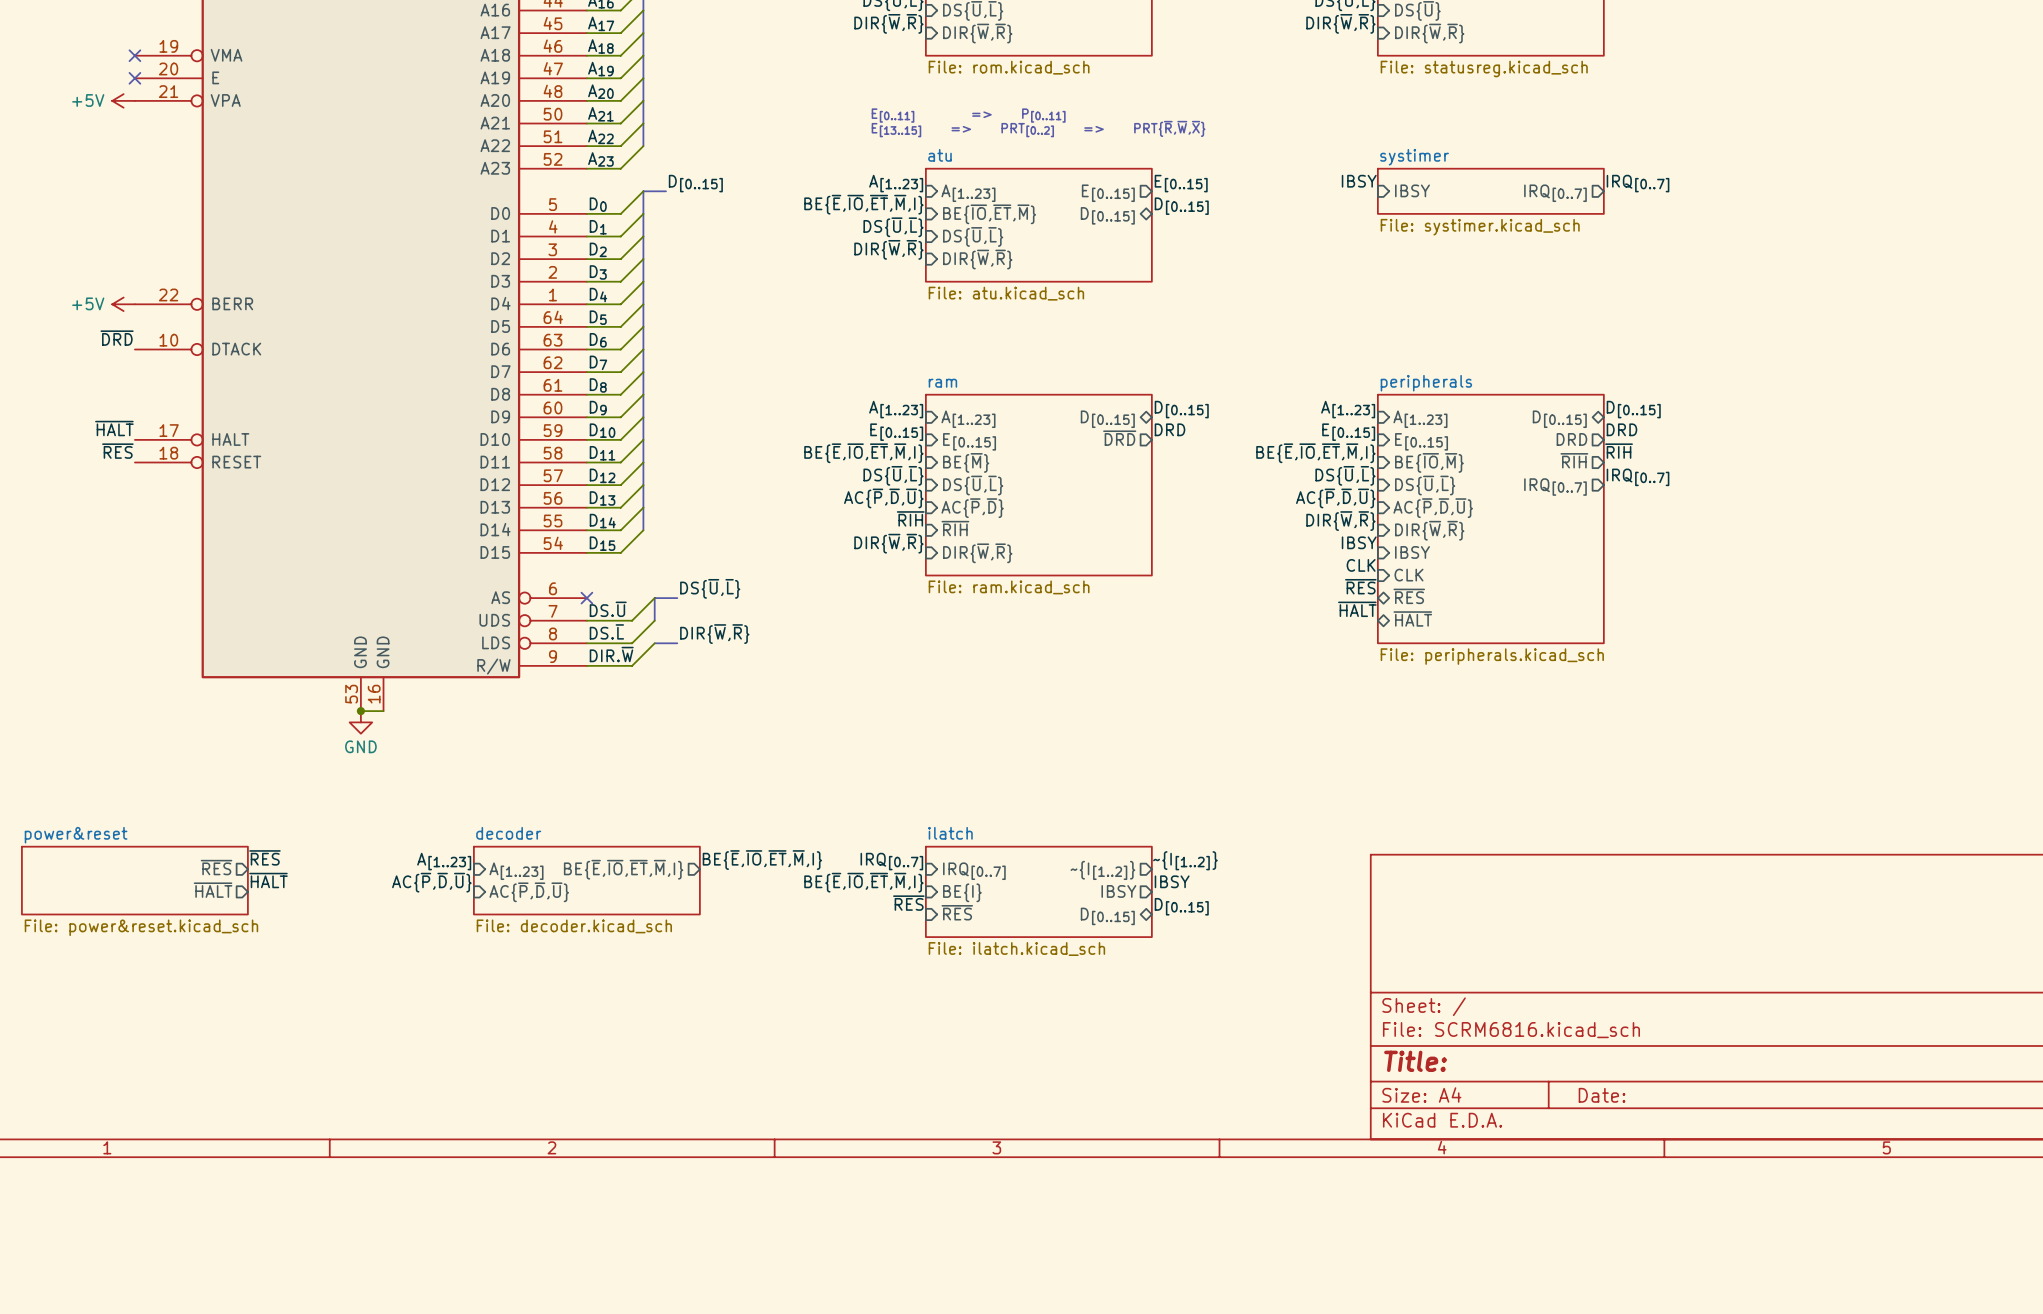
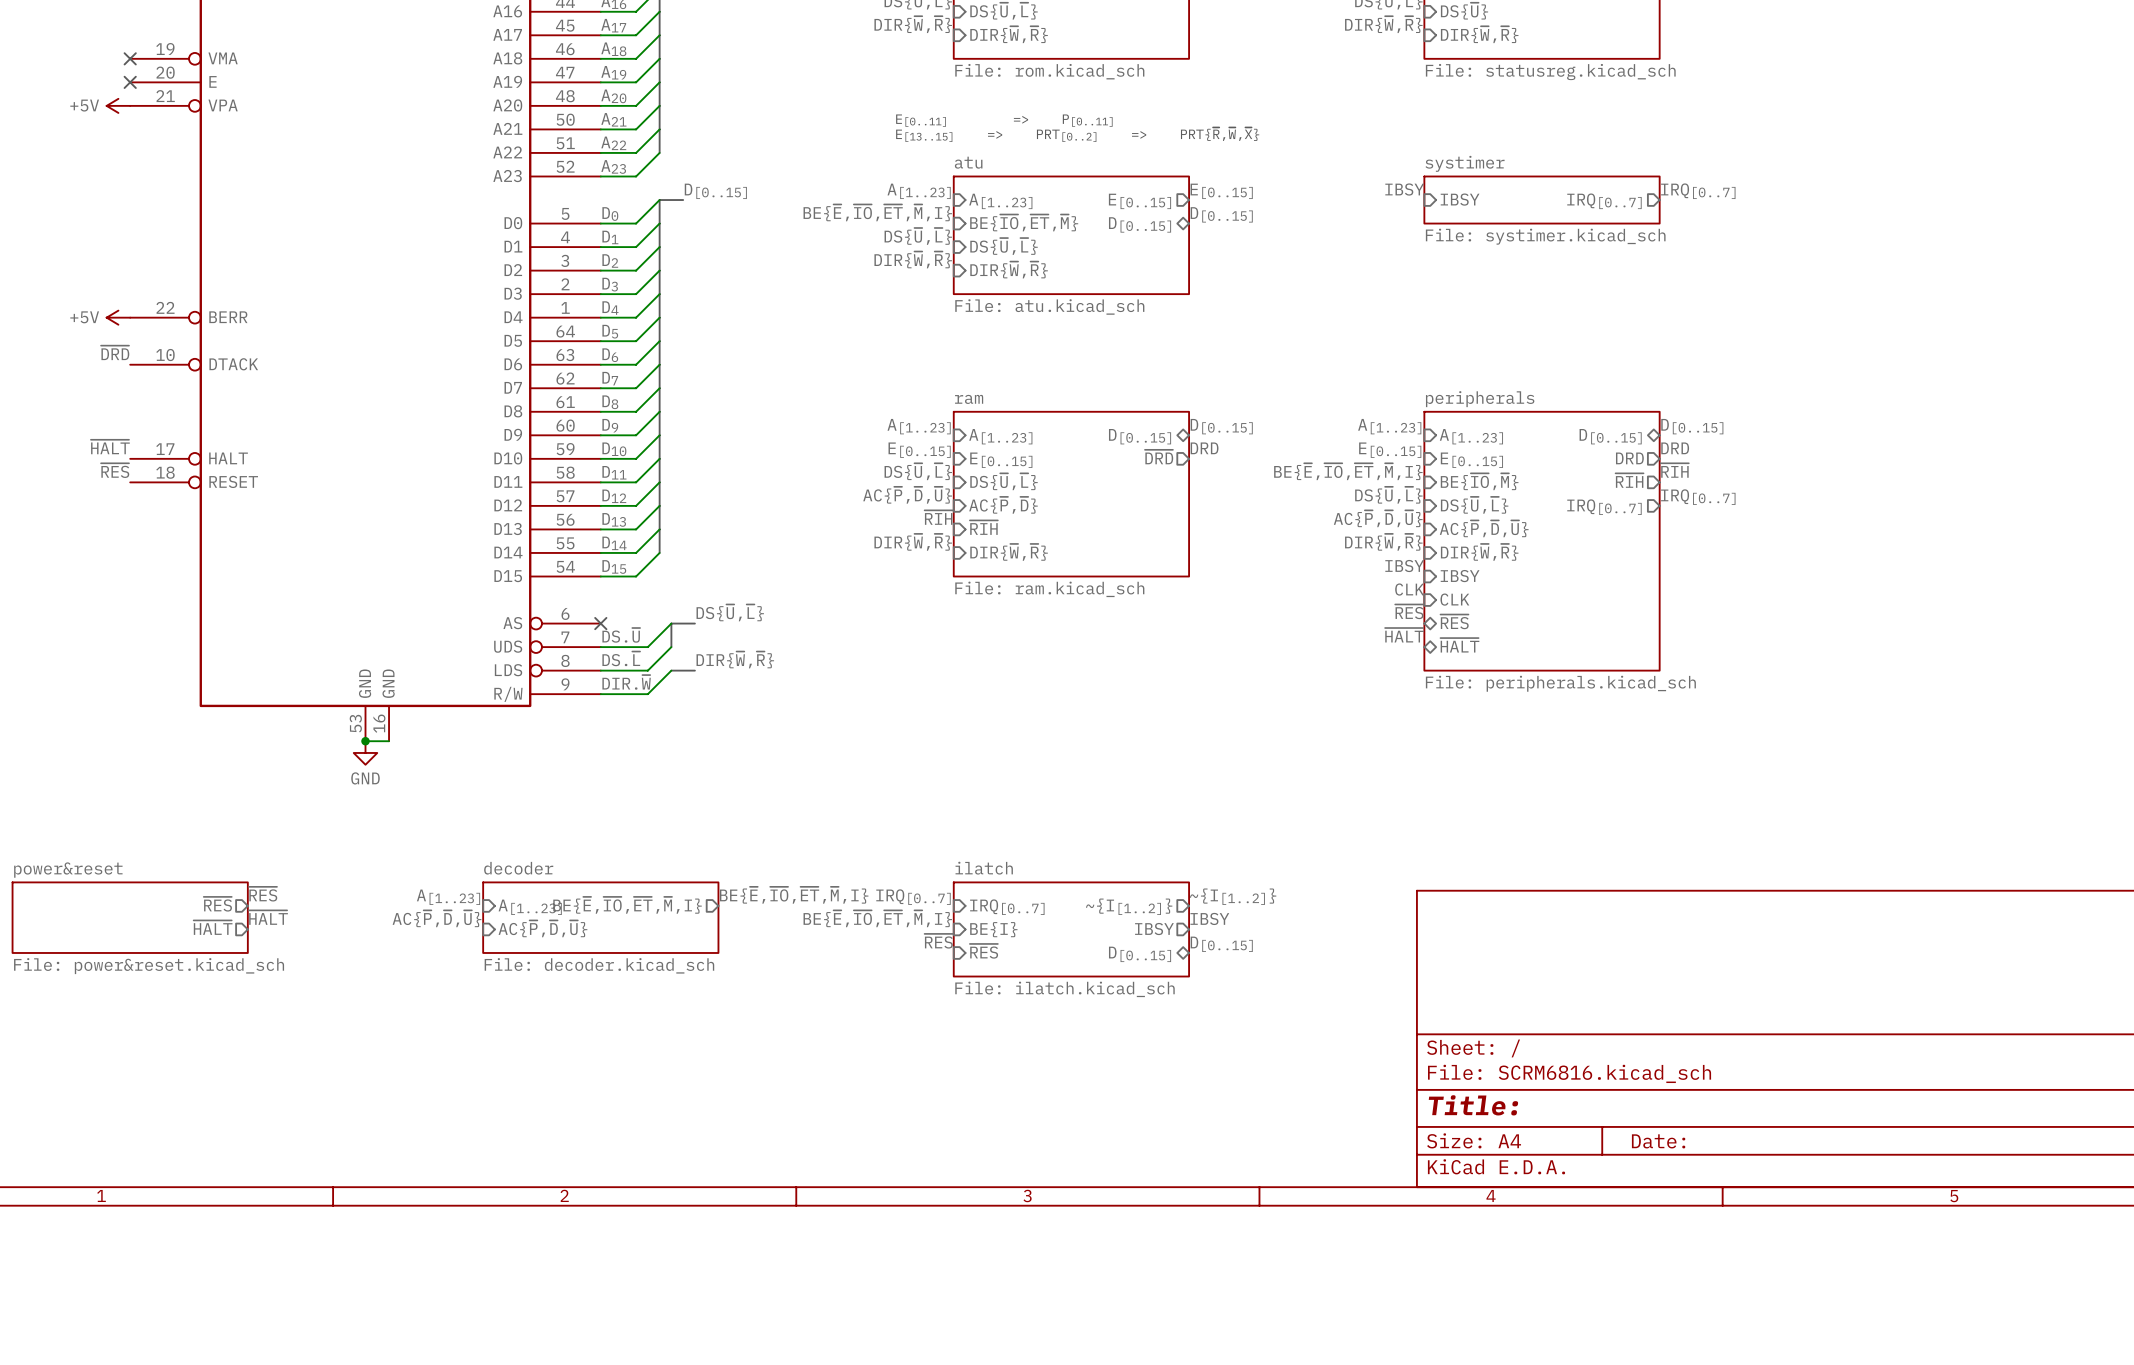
label: BE{~{E},~{IO},~{ET},~{M},I} (863, 453) -> DS{~{U},~{L}} (918, 471)
sheet pin: BE{~{M}} (966, 462) -> DS{~{U},~{L}} (1004, 481)
sheet ram: none -> File: ram.kicad_sch (1071, 494)
label: DS{~{U},~{L}} (893, 475) -> AC{~{P},~{D},~{U}} (907, 495)
sheet pin: DS{~{U},~{L}} (973, 485) -> AC{~{P},~{D}} (1003, 505)
sheet ram: File: ram.kicad_sch (1038, 485) -> none
label: AC{~{P},~{D},~{U}} (883, 498) -> ~{RIH} (938, 517)
sheet pin: AC{~{P},~{D}} (972, 508) -> ~{RIH} (983, 527)
label: ~{RIH} (910, 518) -> DIR{~{W},~{R}} (913, 542)
sheet pin: ~{RIH} (955, 528) -> DIR{~{W},~{R}} (1009, 552)
label: DIR{~{W},~{R}} (888, 543) -> none
sheet pin: DIR{~{W},~{R}} (977, 553) -> none

